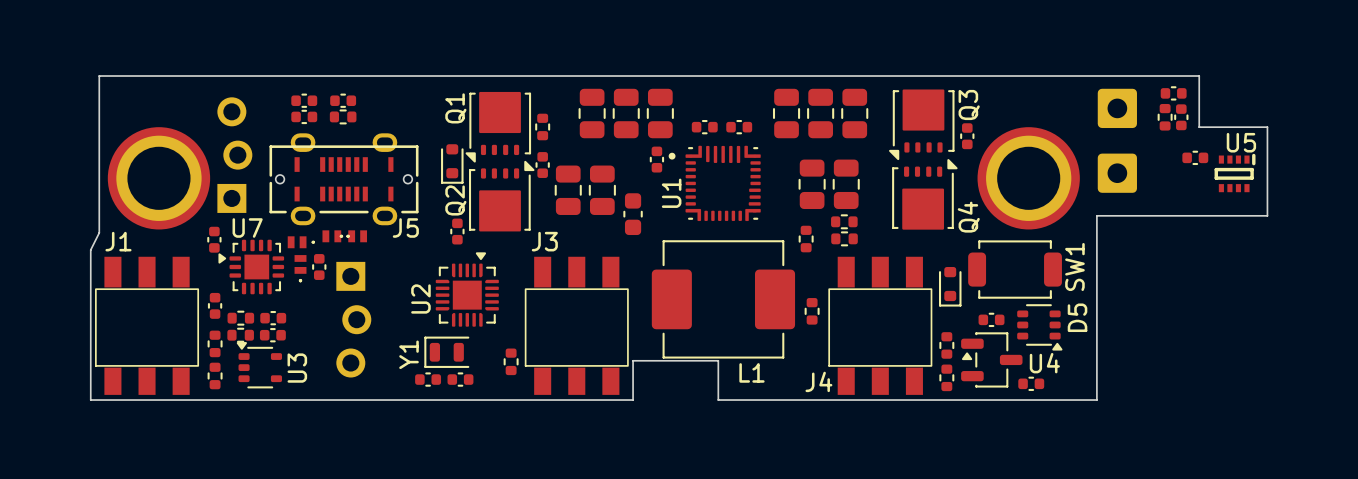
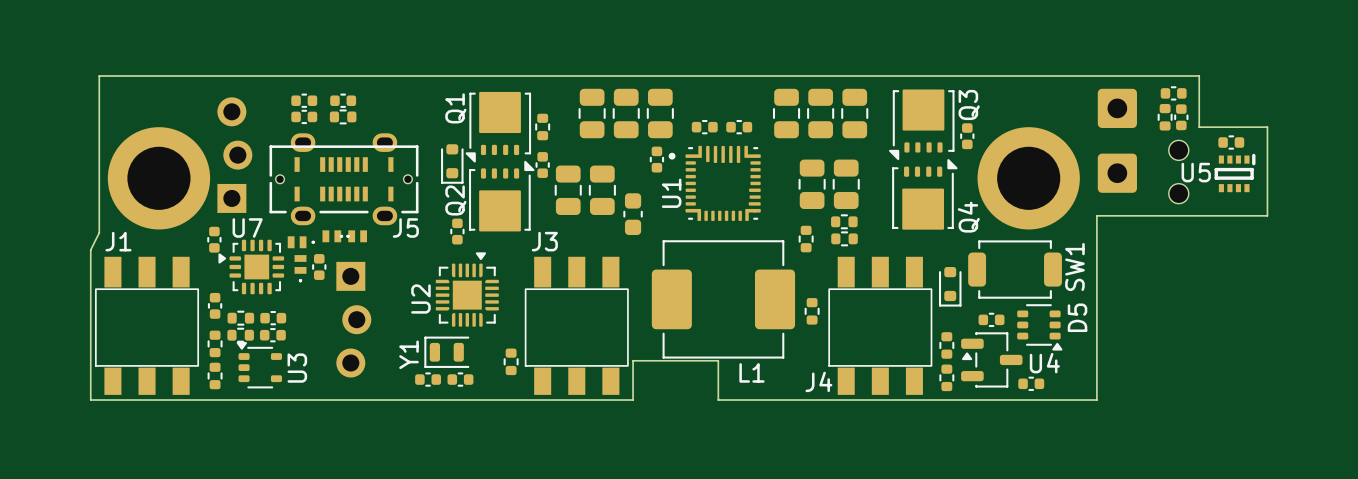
U5 name position: U5 (1241, 142) -> U5 (1196, 172)
part position: (1195, 157) -> (1231, 142)
part: none -> (1178, 172)

